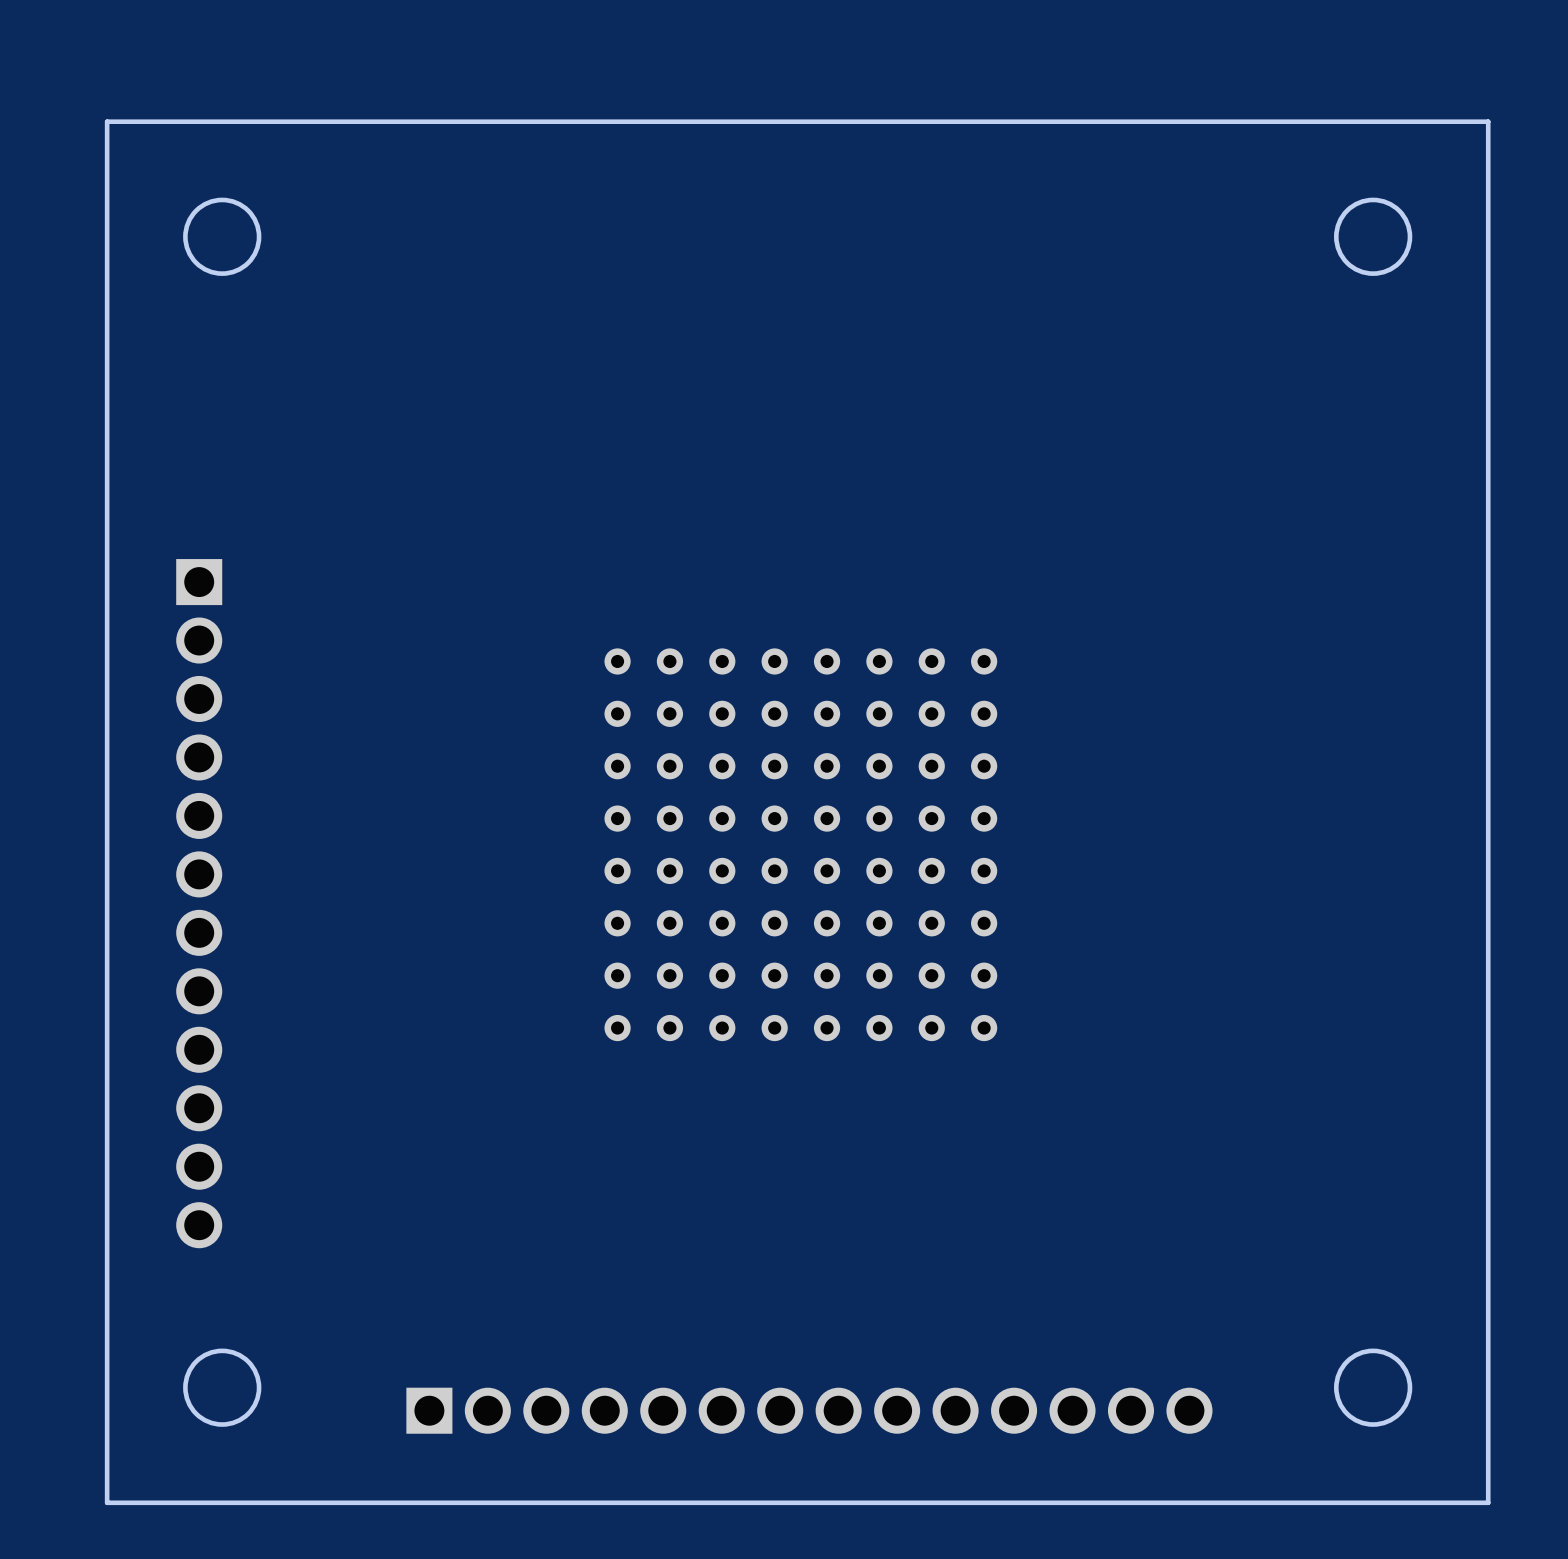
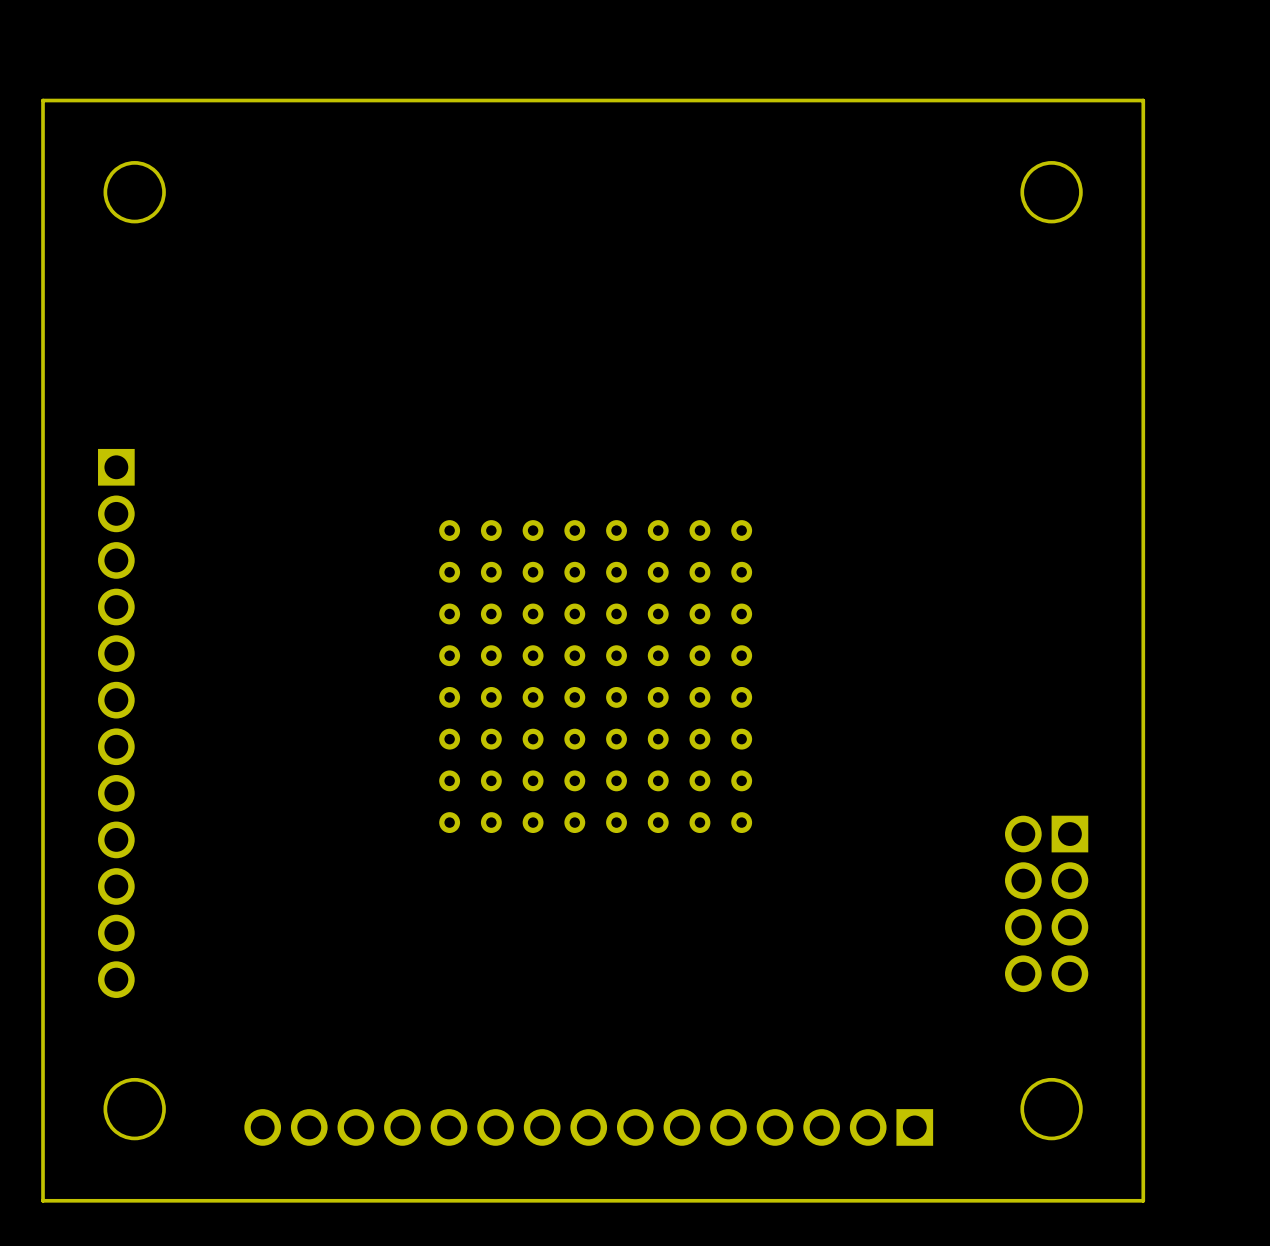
part: none -> (1046, 903)
part footprint: [406, 1387, 1213, 1434] -> [244, 1109, 934, 1146]

